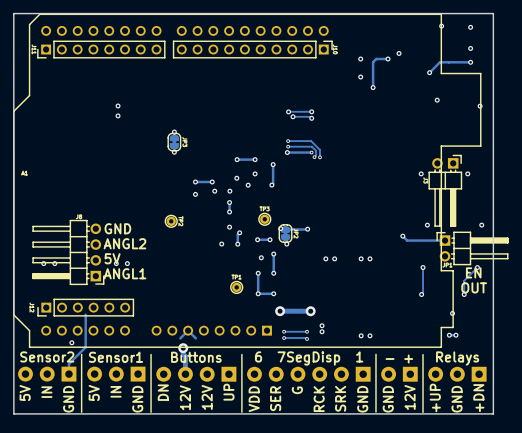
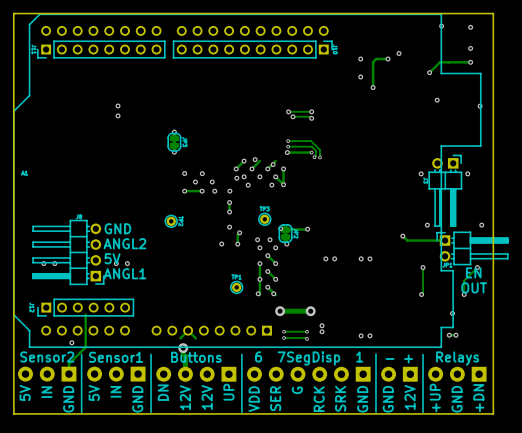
via: (237, 159) -> none
track: (255, 159) (237, 159) -> none
track: none -> (244, 161) (236, 168)
via: none -> (244, 161)
track: none -> (259, 161) (252, 168)
track: none -> (275, 161) (267, 168)
track: (273, 164) (271, 185) -> none
via: none -> (236, 168)
via: none -> (252, 168)
via: none -> (267, 168)
track: none -> (283, 168) (283, 184) (275, 176)
via: none -> (283, 168)
via: none -> (184, 173)
via: none -> (202, 173)
via: (255, 173) -> none
via: none -> (244, 176)
via: none -> (259, 176)
via: none -> (275, 176)
track: (212, 181) (195, 181) -> none
via: none -> (283, 184)
via: none -> (184, 191)
track: none -> (202, 191) (184, 191)
via: none -> (202, 191)
via: (195, 194) -> none
track: (270, 239) (257, 239) -> none
via: none -> (259, 247)
via: none -> (275, 247)
track: (273, 254) (273, 273) -> none
via: (273, 254) -> none
track: none -> (267, 255) (275, 263)
via: none -> (267, 255)
via: (261, 257) -> none
track: none -> (259, 263) (259, 295)
via: none -> (259, 263)
via: none -> (275, 263)
track: none -> (267, 271) (275, 279)
via: none -> (267, 271)
track: (258, 273) (258, 293) (273, 293) -> none
via: (258, 273) -> none
via: (273, 273) -> none
via: none -> (259, 279)
via: none -> (275, 279)
track: none -> (267, 287) (275, 295)
via: none -> (267, 287)

